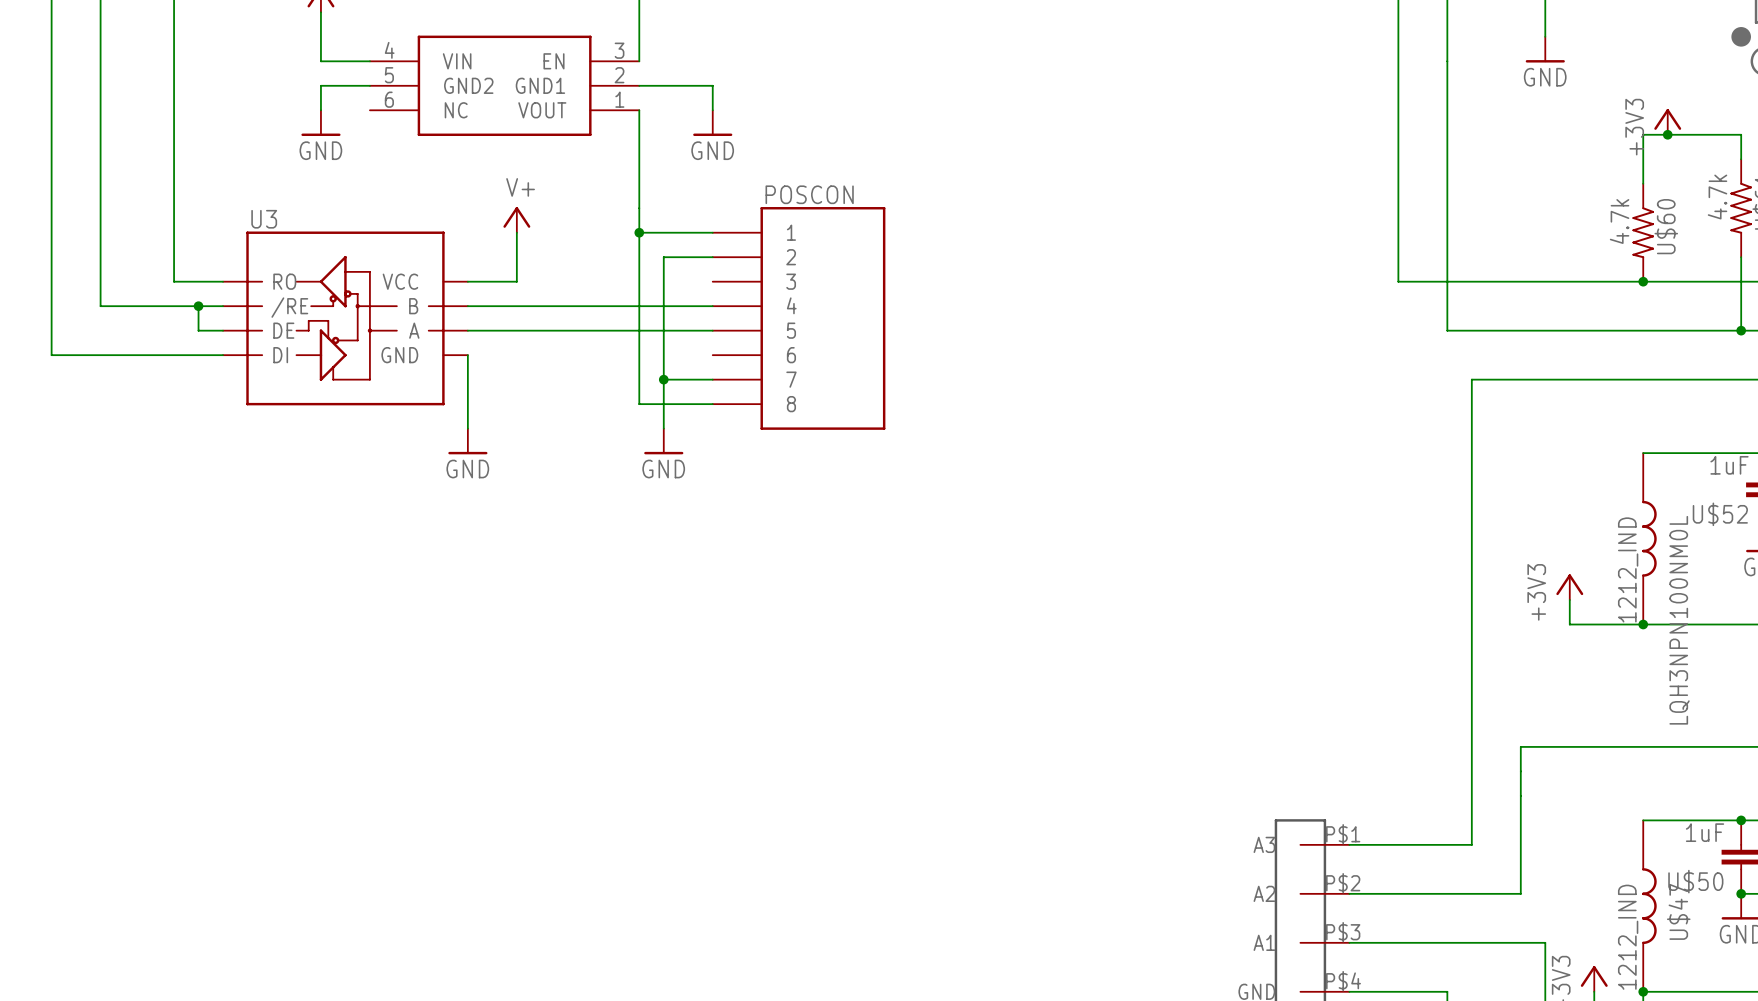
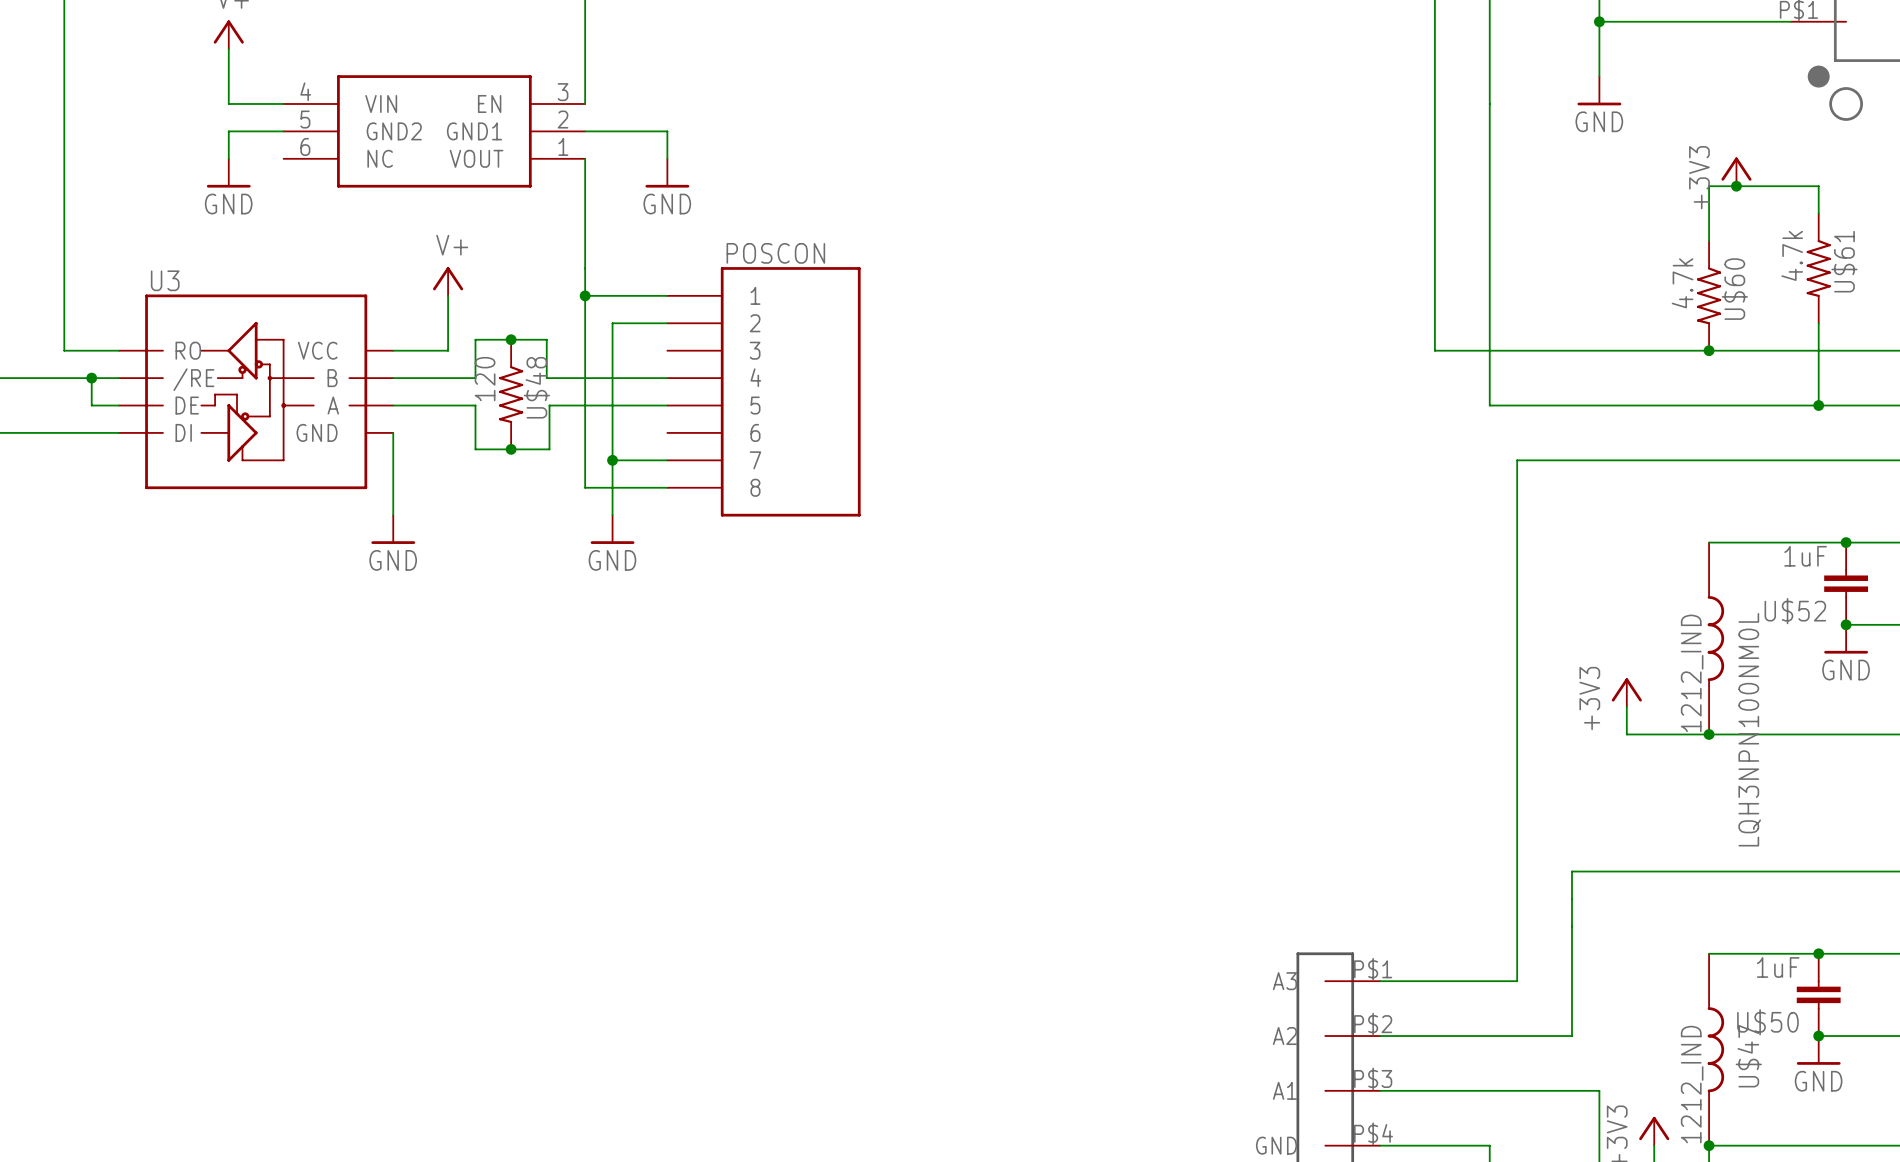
junction: none -> (511, 339)
wire: (541, 306) (605, 306) -> (475, 378) (475, 339) (546, 339) (546, 378)
U$48: none -> 120 (511, 394)
wire: (541, 330) (607, 330) -> (475, 405) (475, 449) (549, 449) (549, 405)
junction: none -> (511, 449)

